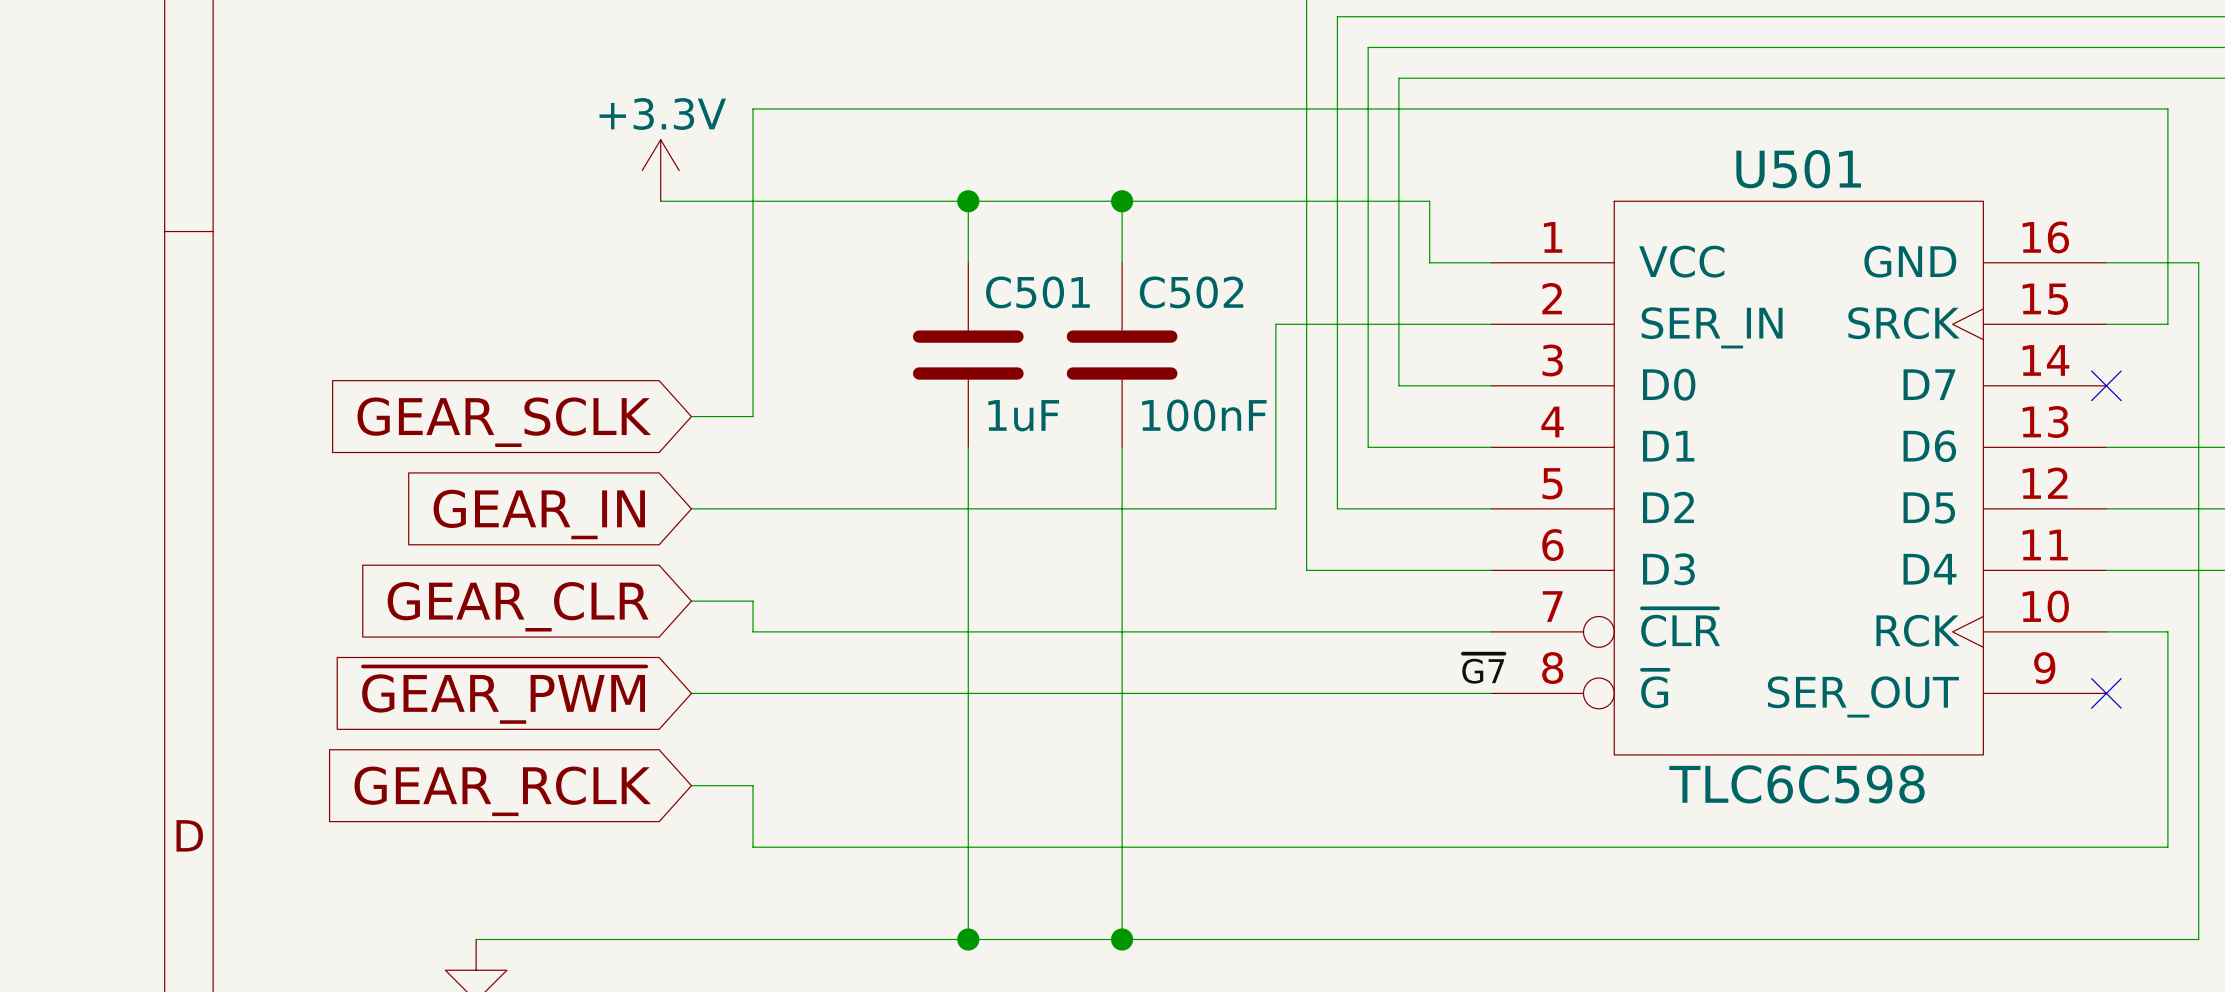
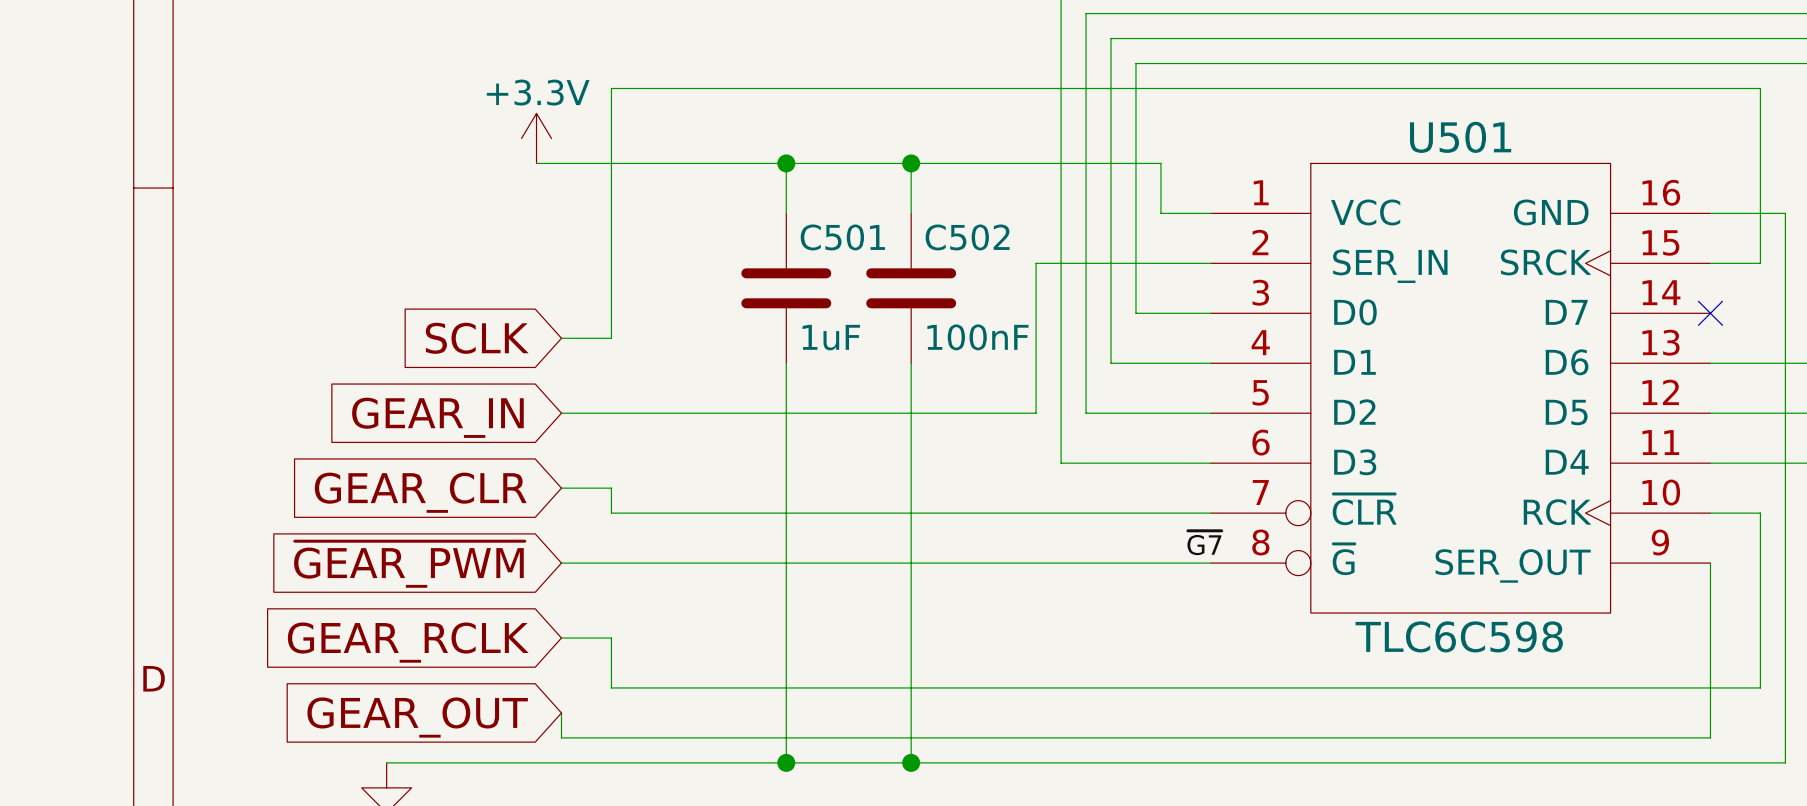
global label: GEAR_SCLK (504, 422) -> SCLK (477, 338)
wire: none -> (1710, 563) (1710, 737) (561, 737) (561, 712)
no-connect mark: (2106, 693) -> none
global label: none -> GEAR_OUT (417, 717)

